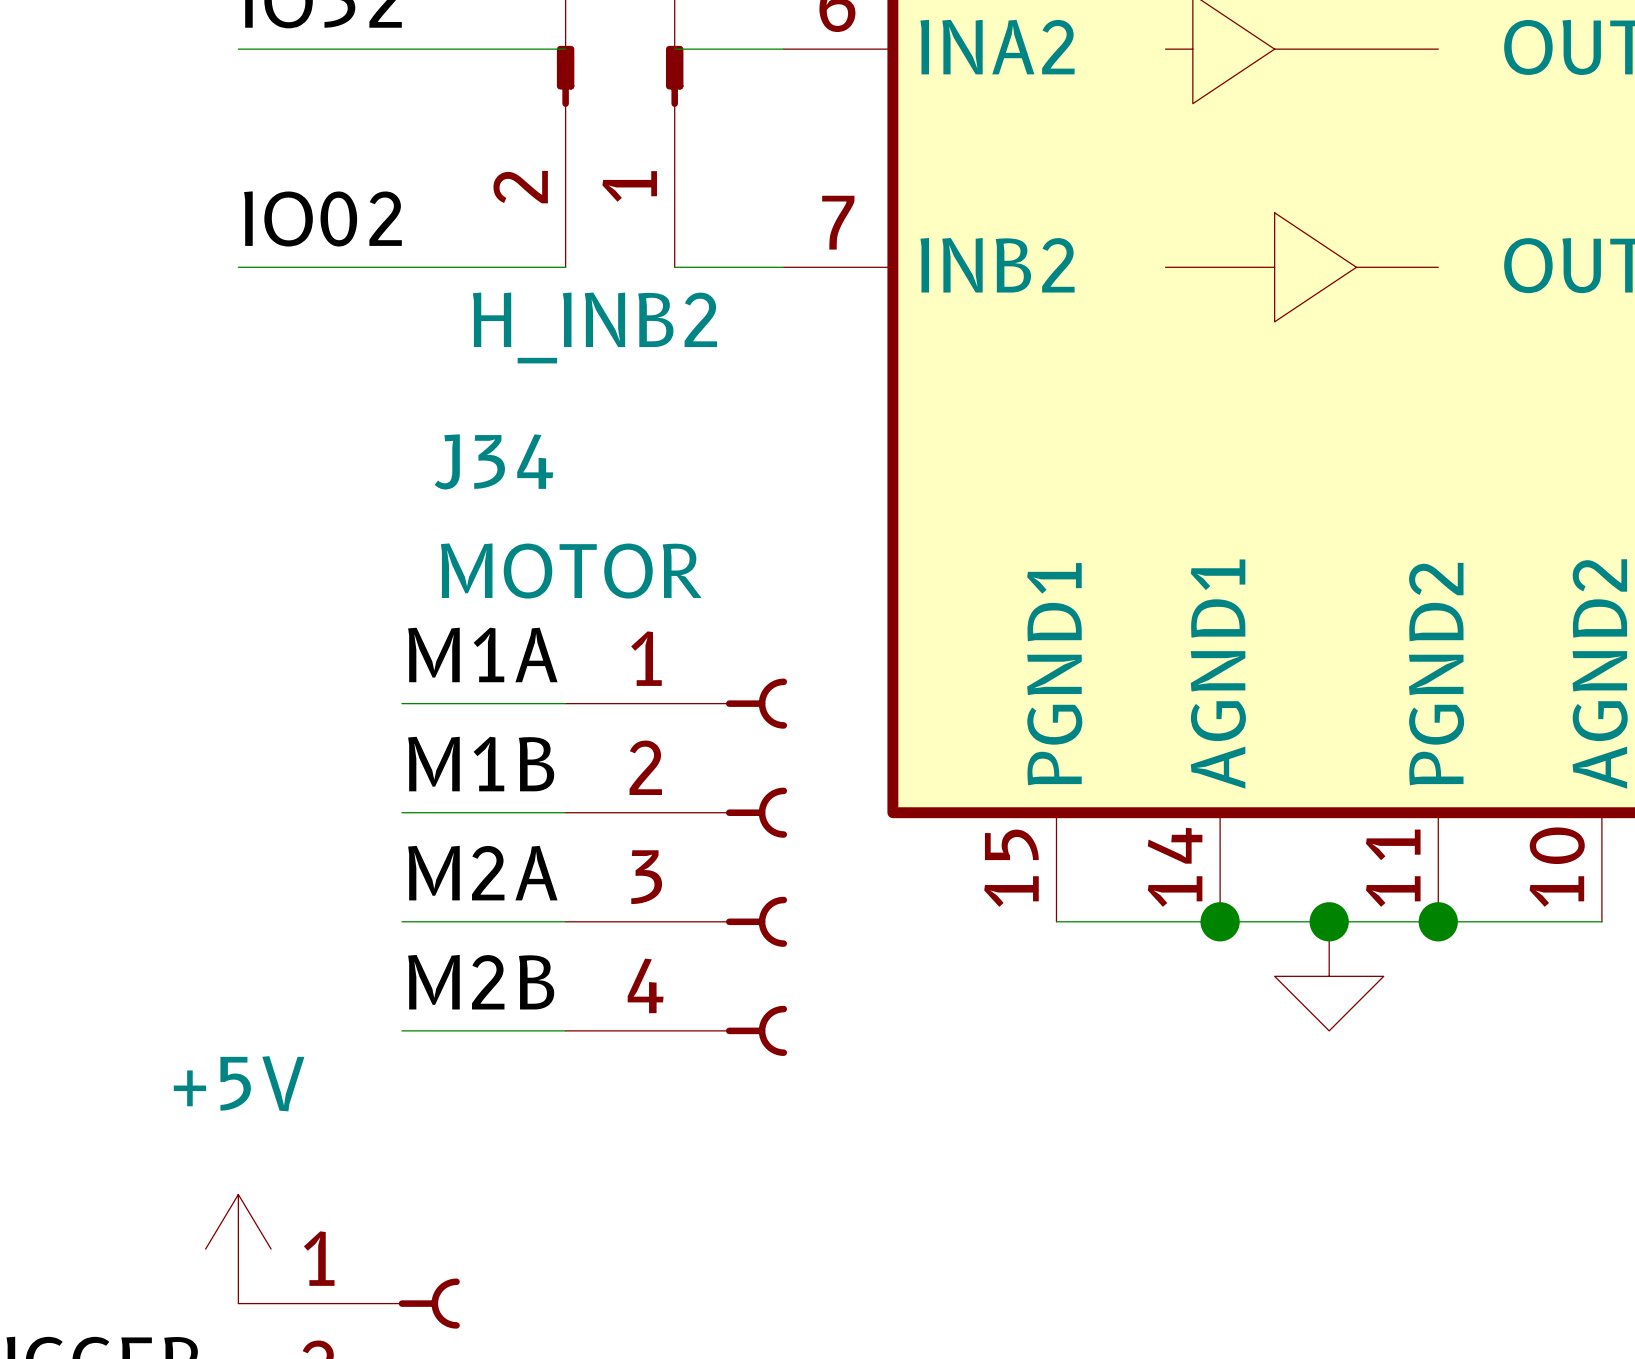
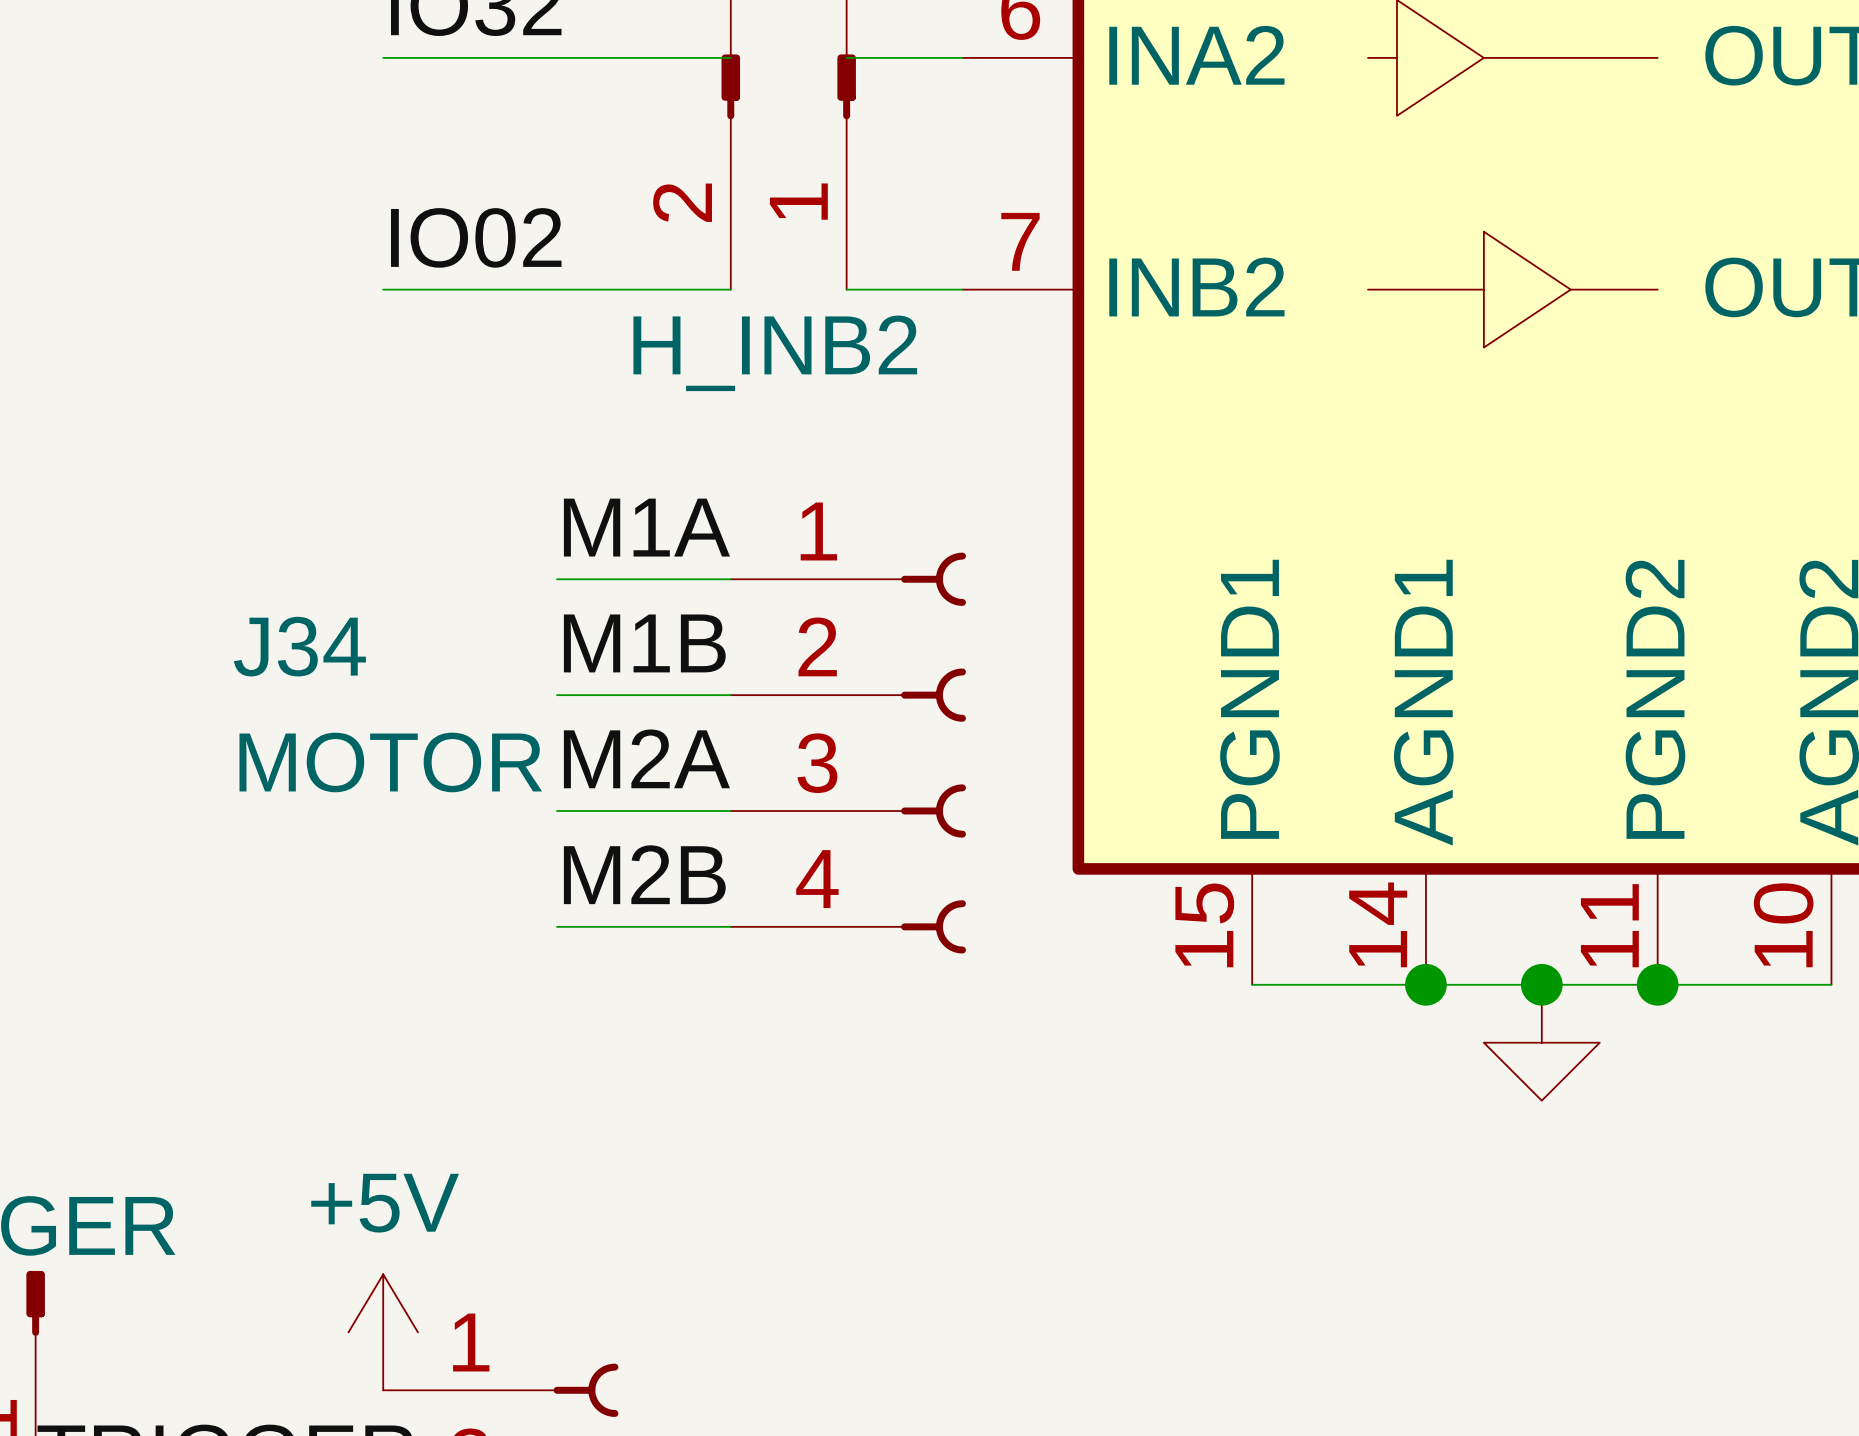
J34 name position: J34 (493, 461) -> J34 (299, 646)
J34 value position: MOTOR (571, 571) -> MOTOR (390, 762)
label position: M1A (482, 654) -> M1A (646, 527)
wire: (401, 703) (565, 703) -> (557, 579) (730, 579)
label position: M1B (481, 764) -> M1B (644, 643)
wire: (401, 812) (565, 812) -> (557, 695) (730, 695)
J34 position: (676, 867) -> (848, 753)
label position: M2A (482, 873) -> M2A (646, 758)
wire: (401, 921) (565, 921) -> (557, 811) (730, 811)
label position: M2B (481, 982) -> M2B (644, 874)
wire: (401, 1030) (565, 1030) -> (557, 926) (730, 926)
power symbol text position: +5V (239, 1083) -> +5V (385, 1203)

